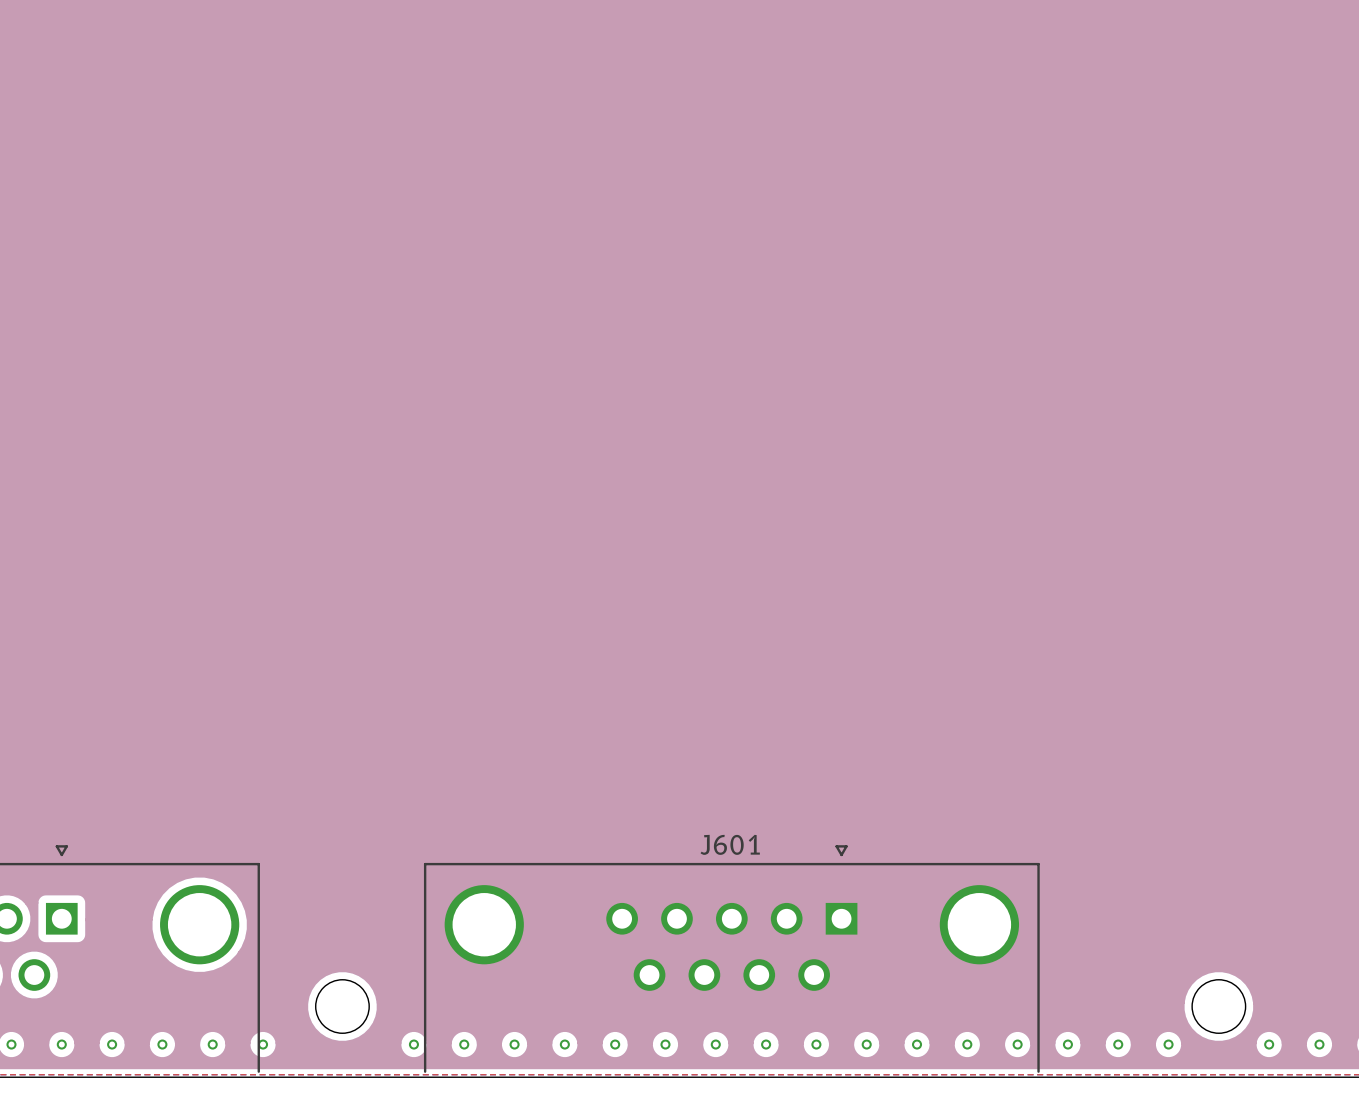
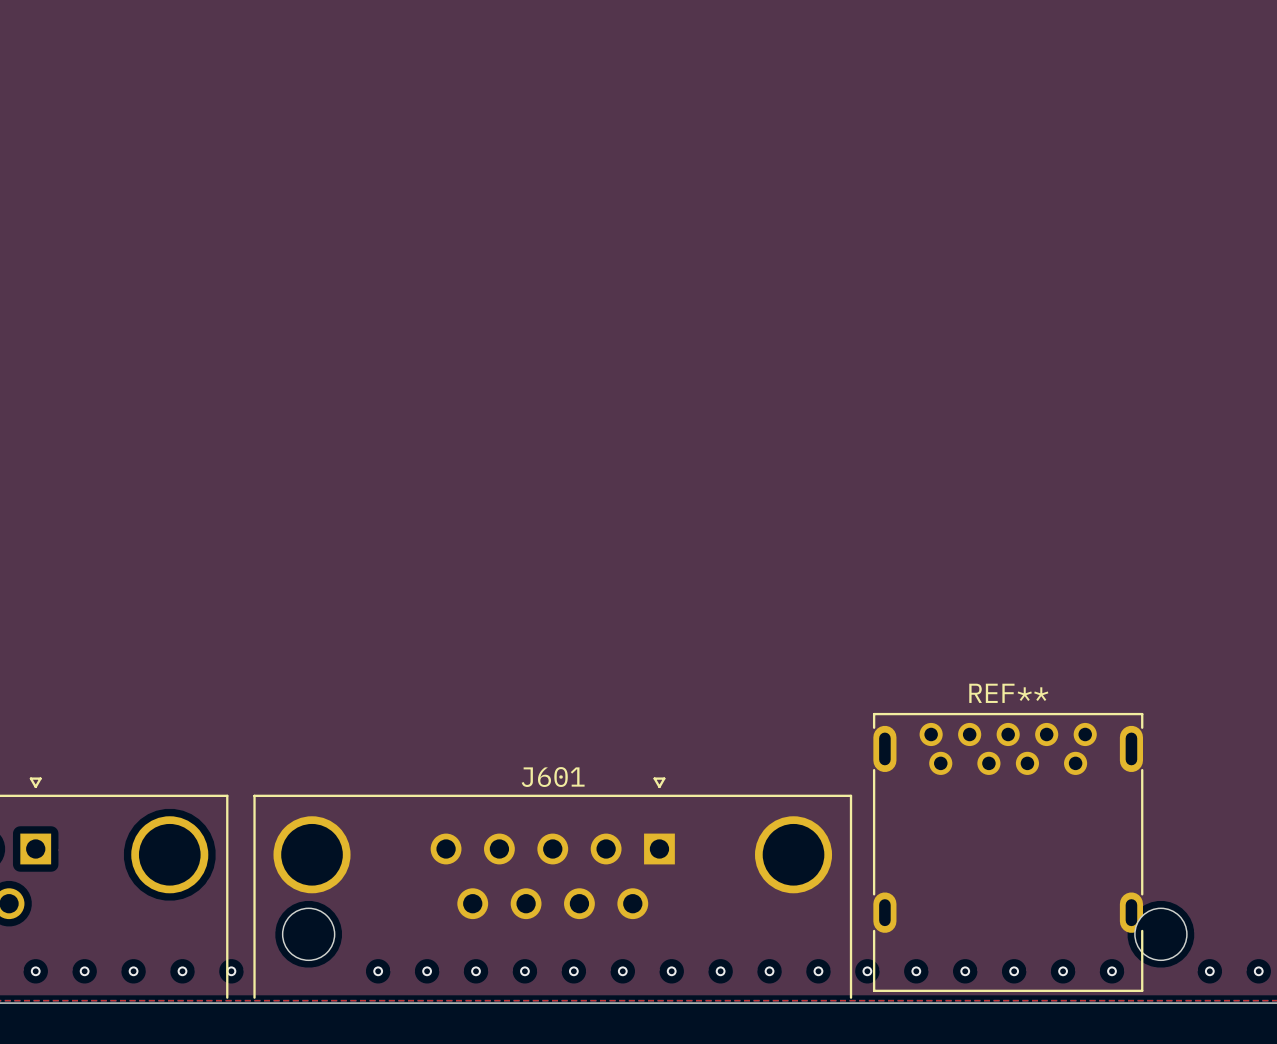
REF**: none -> (1008, 852)
J601 position: (731, 959) -> (552, 888)

